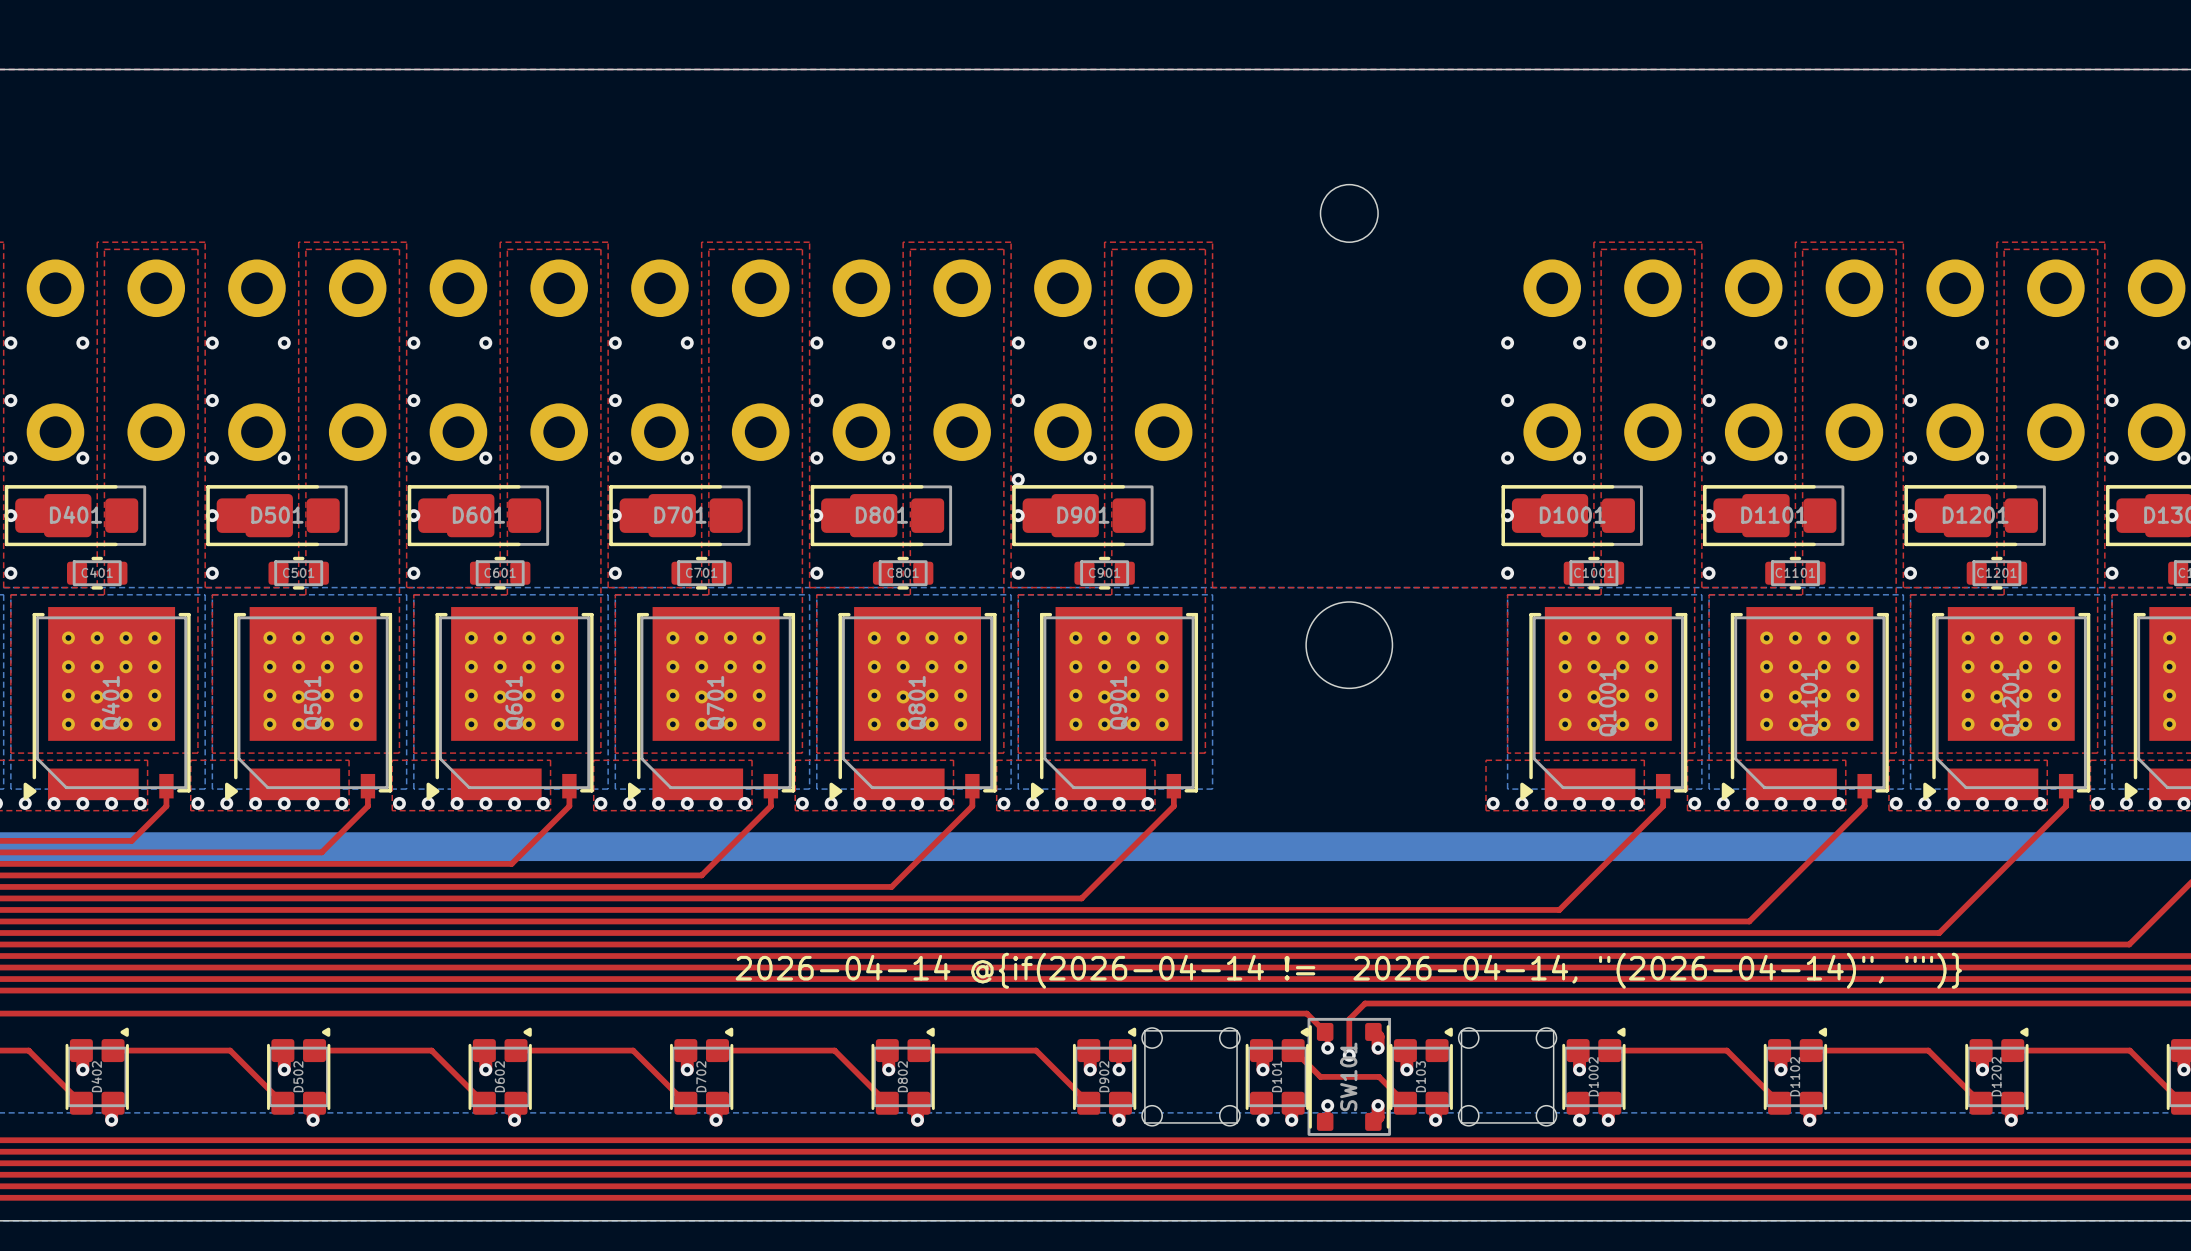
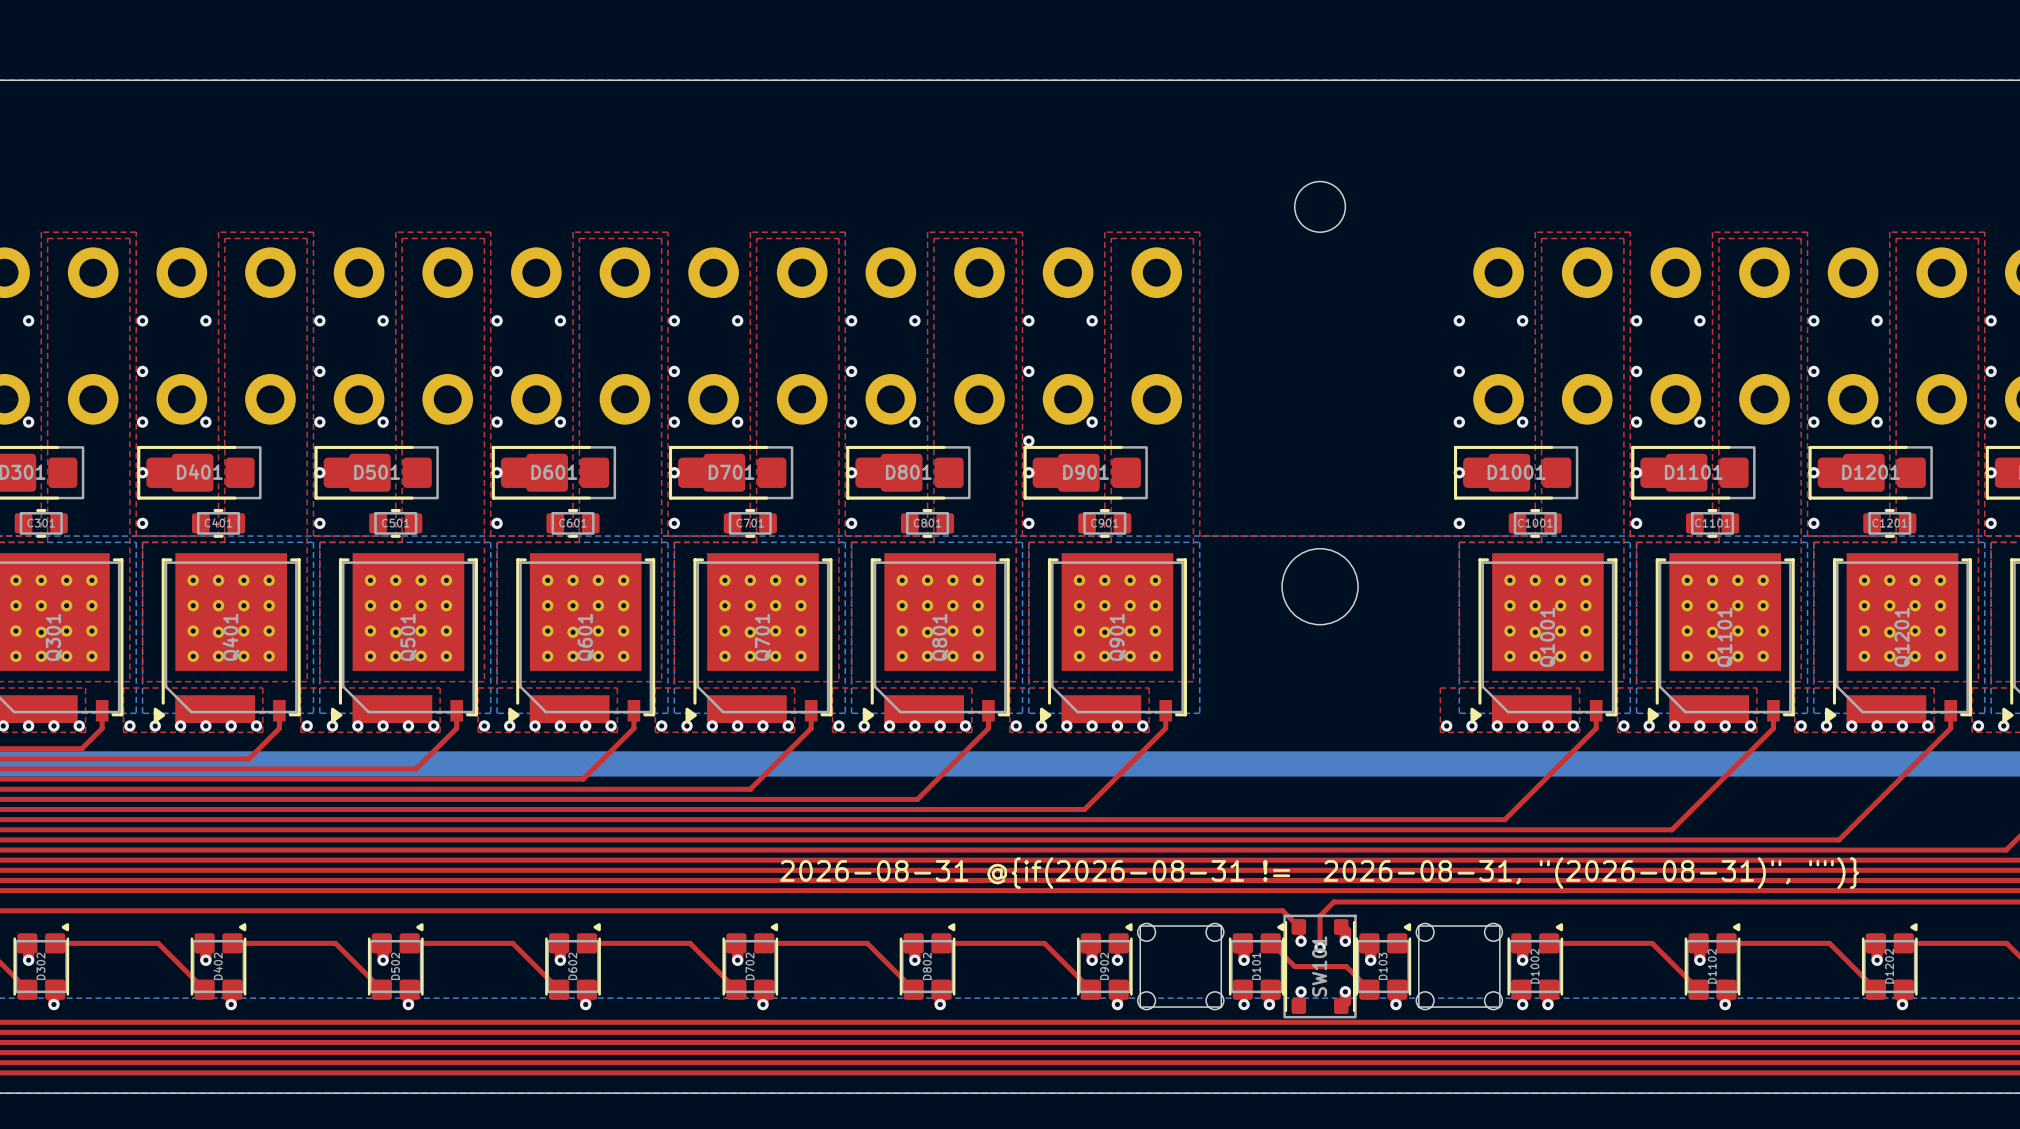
drawing shape: [735, 952, 1962, 989] -> [780, 857, 1859, 889]

